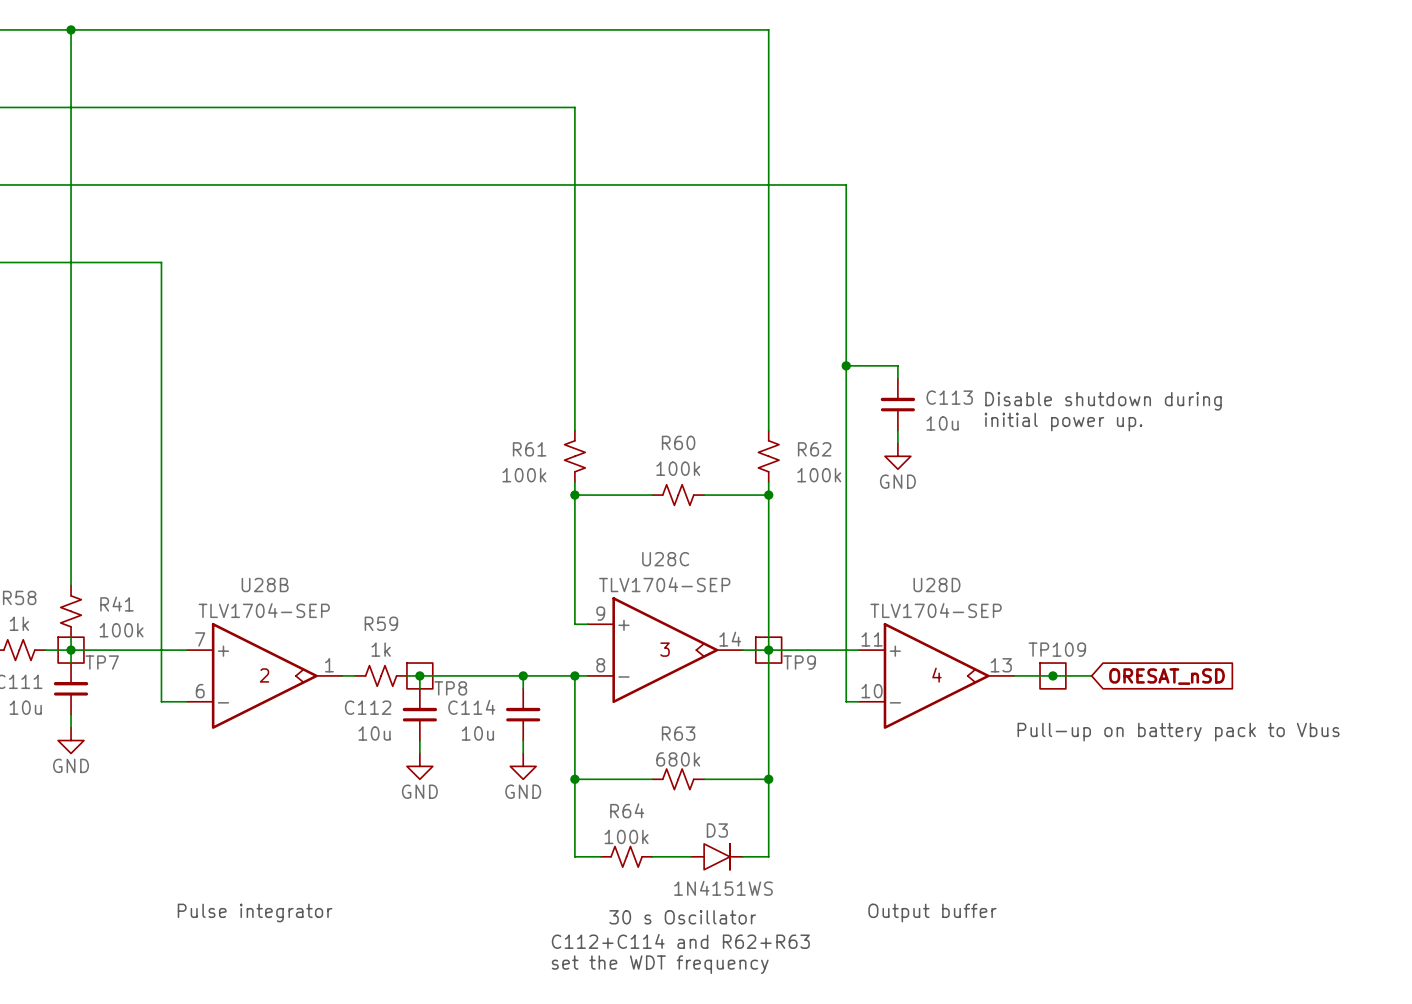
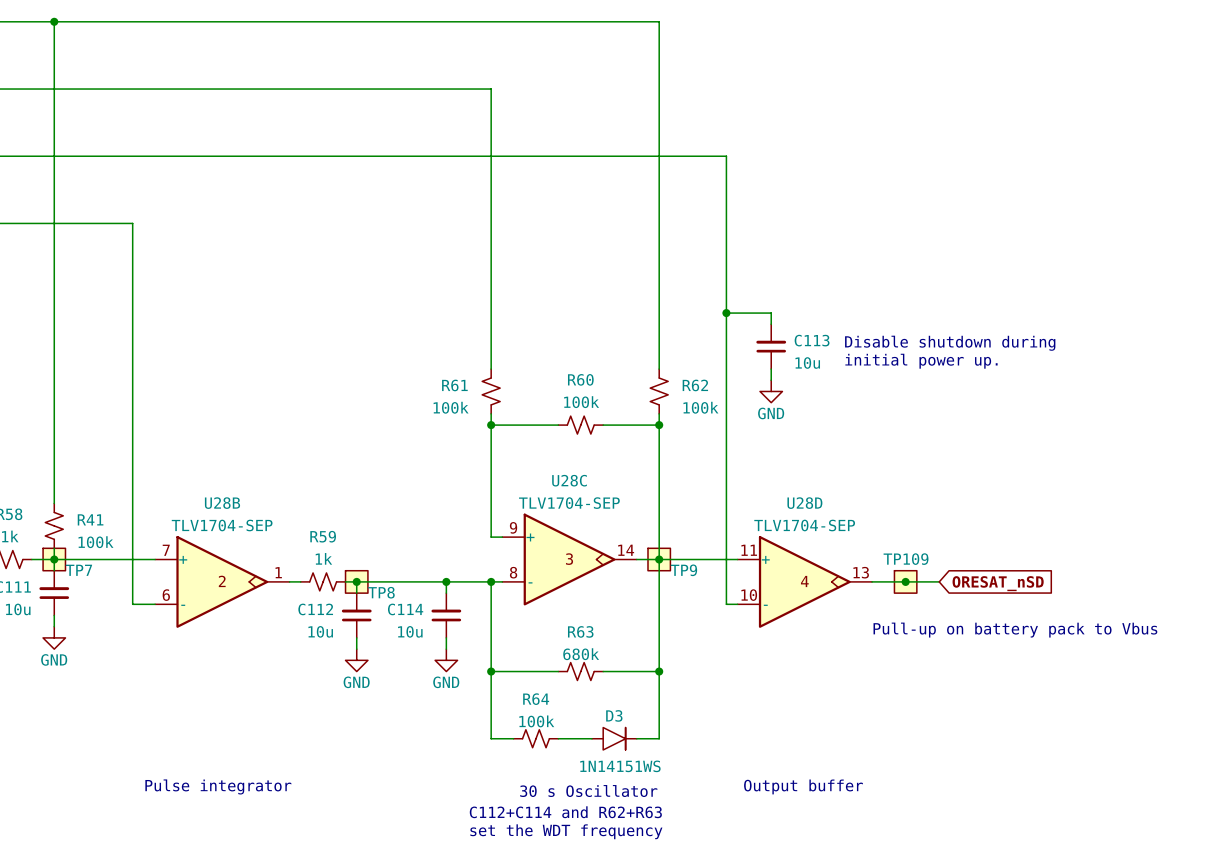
D3 value: 1N4151WS (723, 888) -> 1N14151WS (620, 766)

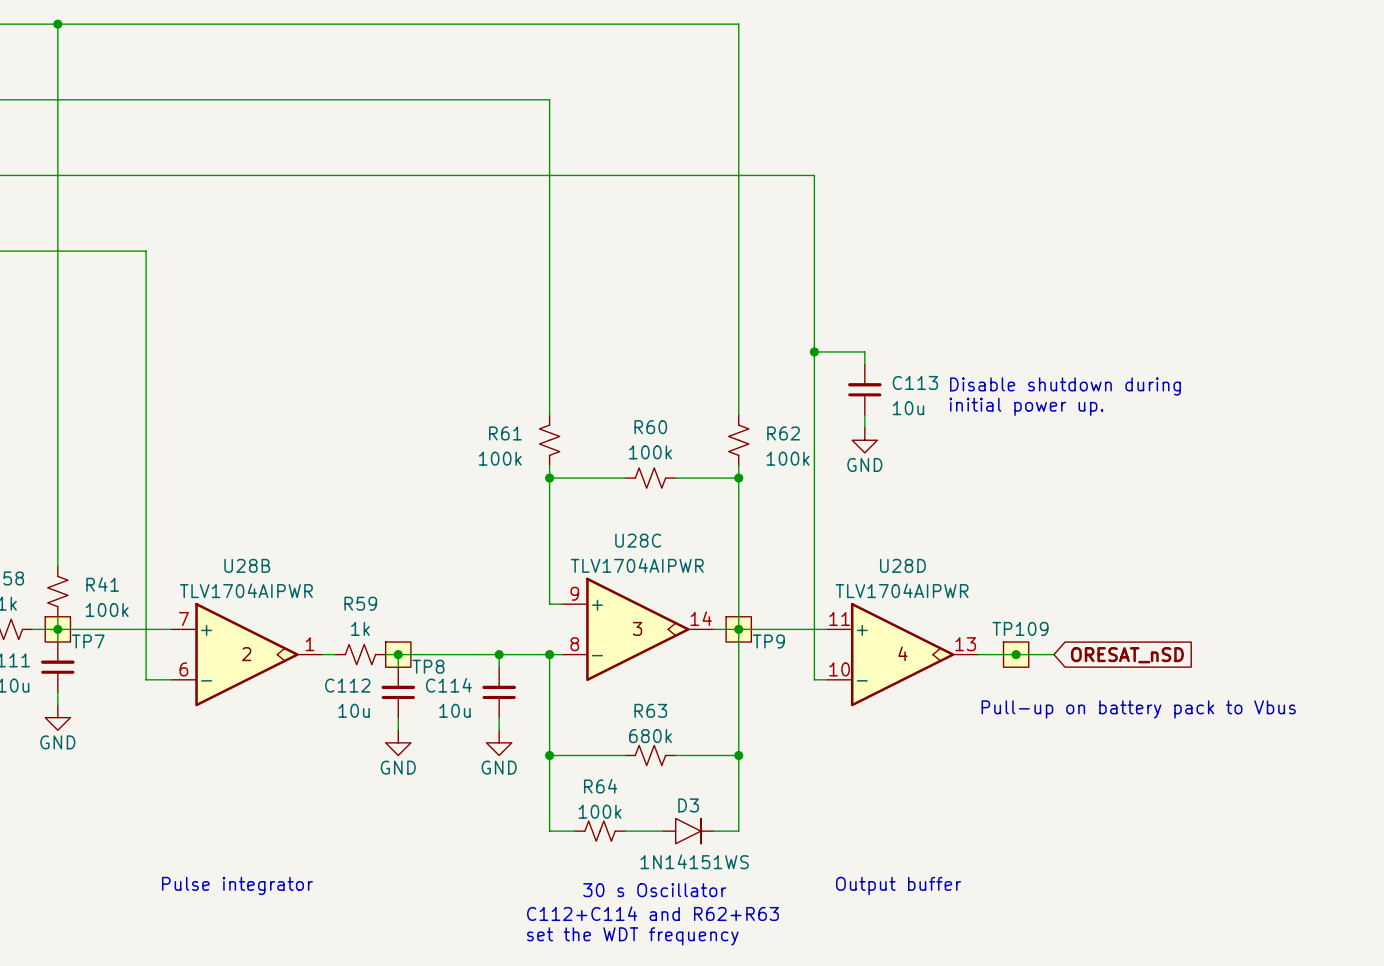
U28C value: TLV1704-SEP (569, 503) -> TLV1704AIPWR (637, 565)
U28B value: TLV1704-SEP (222, 525) -> TLV1704AIPWR (246, 590)
U28D value: TLV1704-SEP (804, 525) -> TLV1704AIPWR (902, 590)

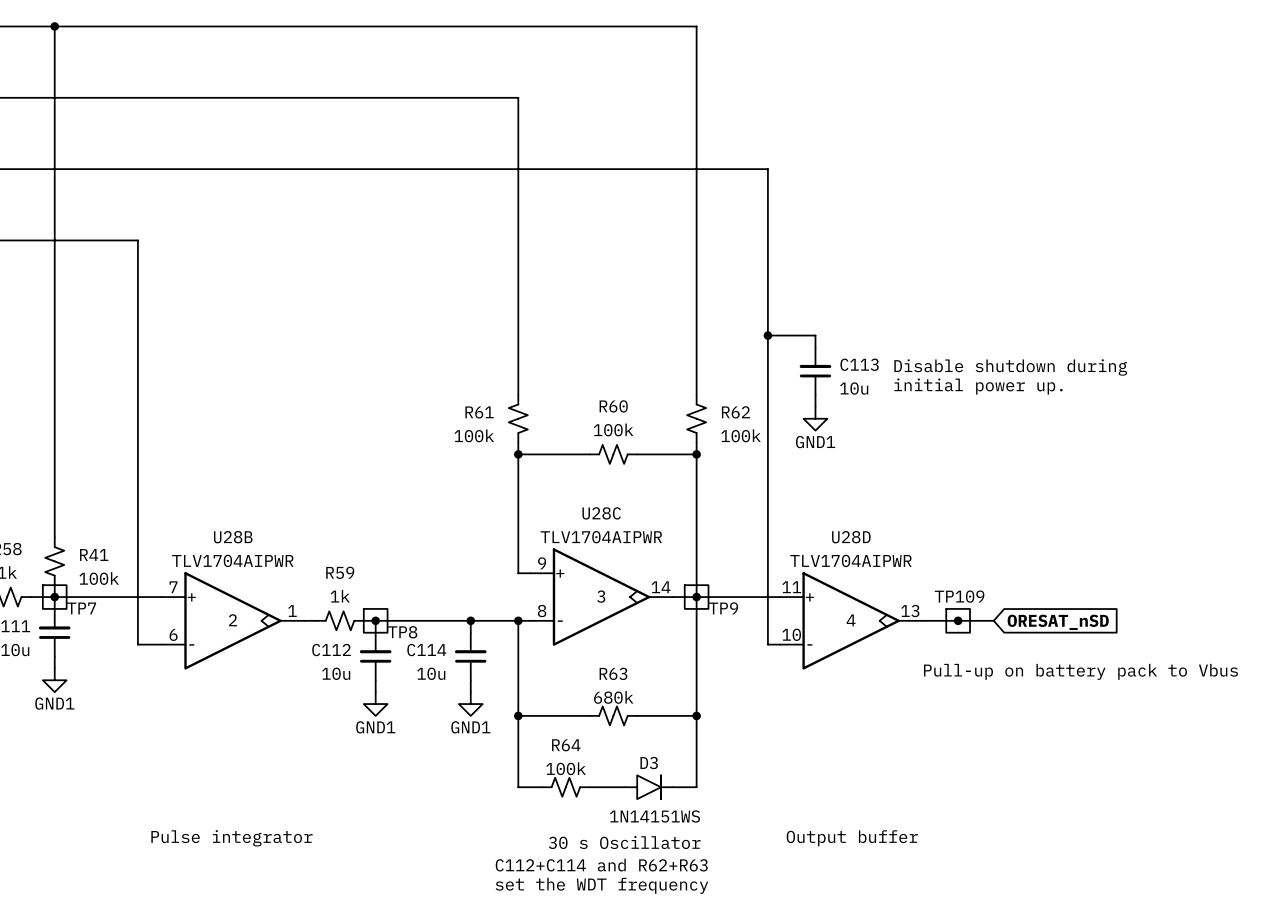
power symbol: GND (864, 440) -> GND1 (815, 418)
power symbol: GND (57, 717) -> GND1 (54, 680)
power symbol: GND (398, 742) -> GND1 (375, 704)
power symbol: GND (499, 742) -> GND1 (470, 704)

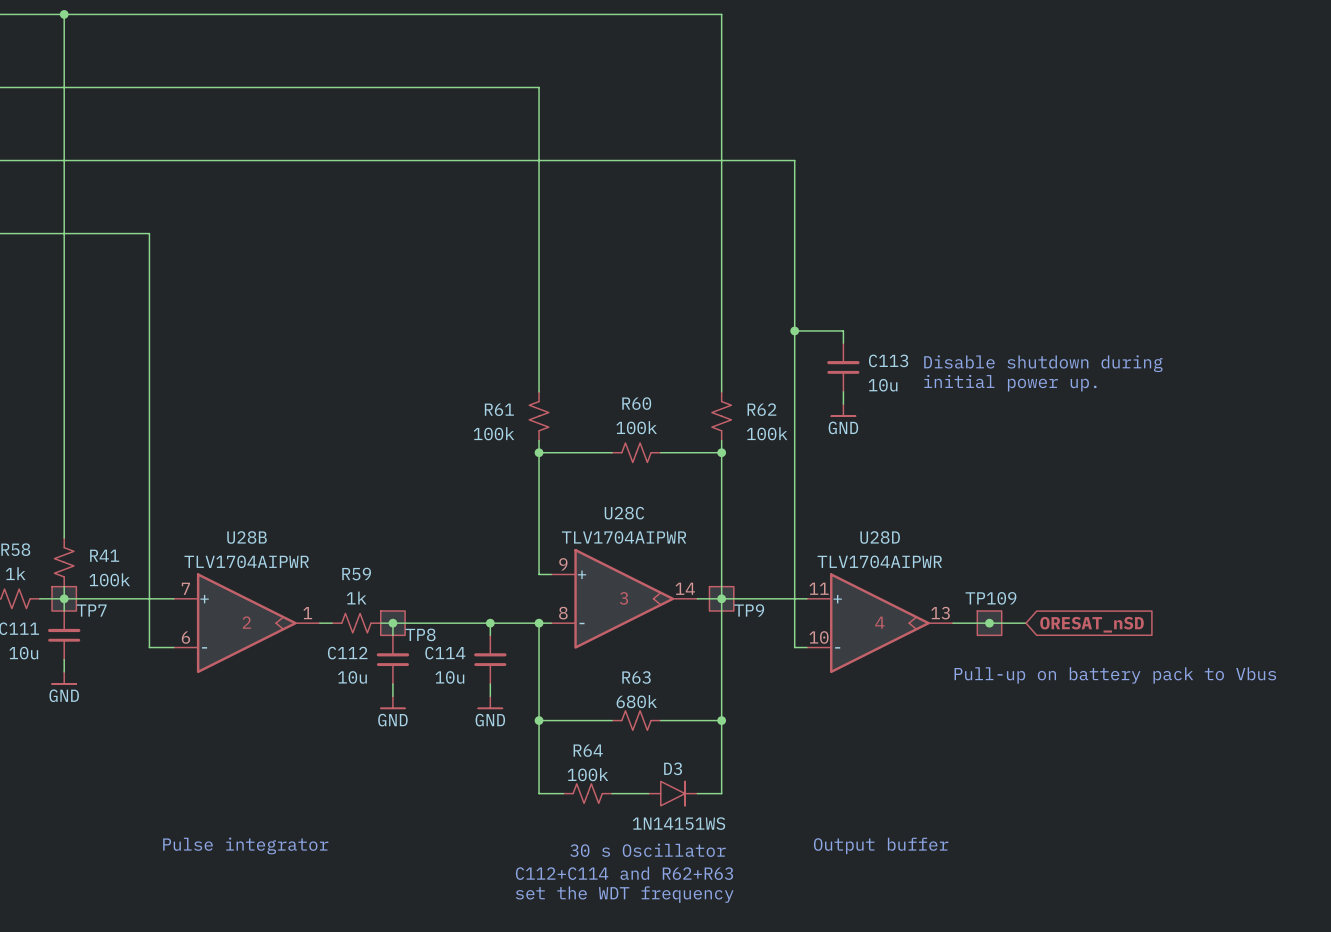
power symbol: GND1 (815, 418) -> GND (843, 410)
power symbol: GND1 (54, 680) -> GND (64, 677)
power symbol: GND1 (375, 704) -> GND (392, 702)
power symbol: GND1 (470, 704) -> GND (490, 702)

